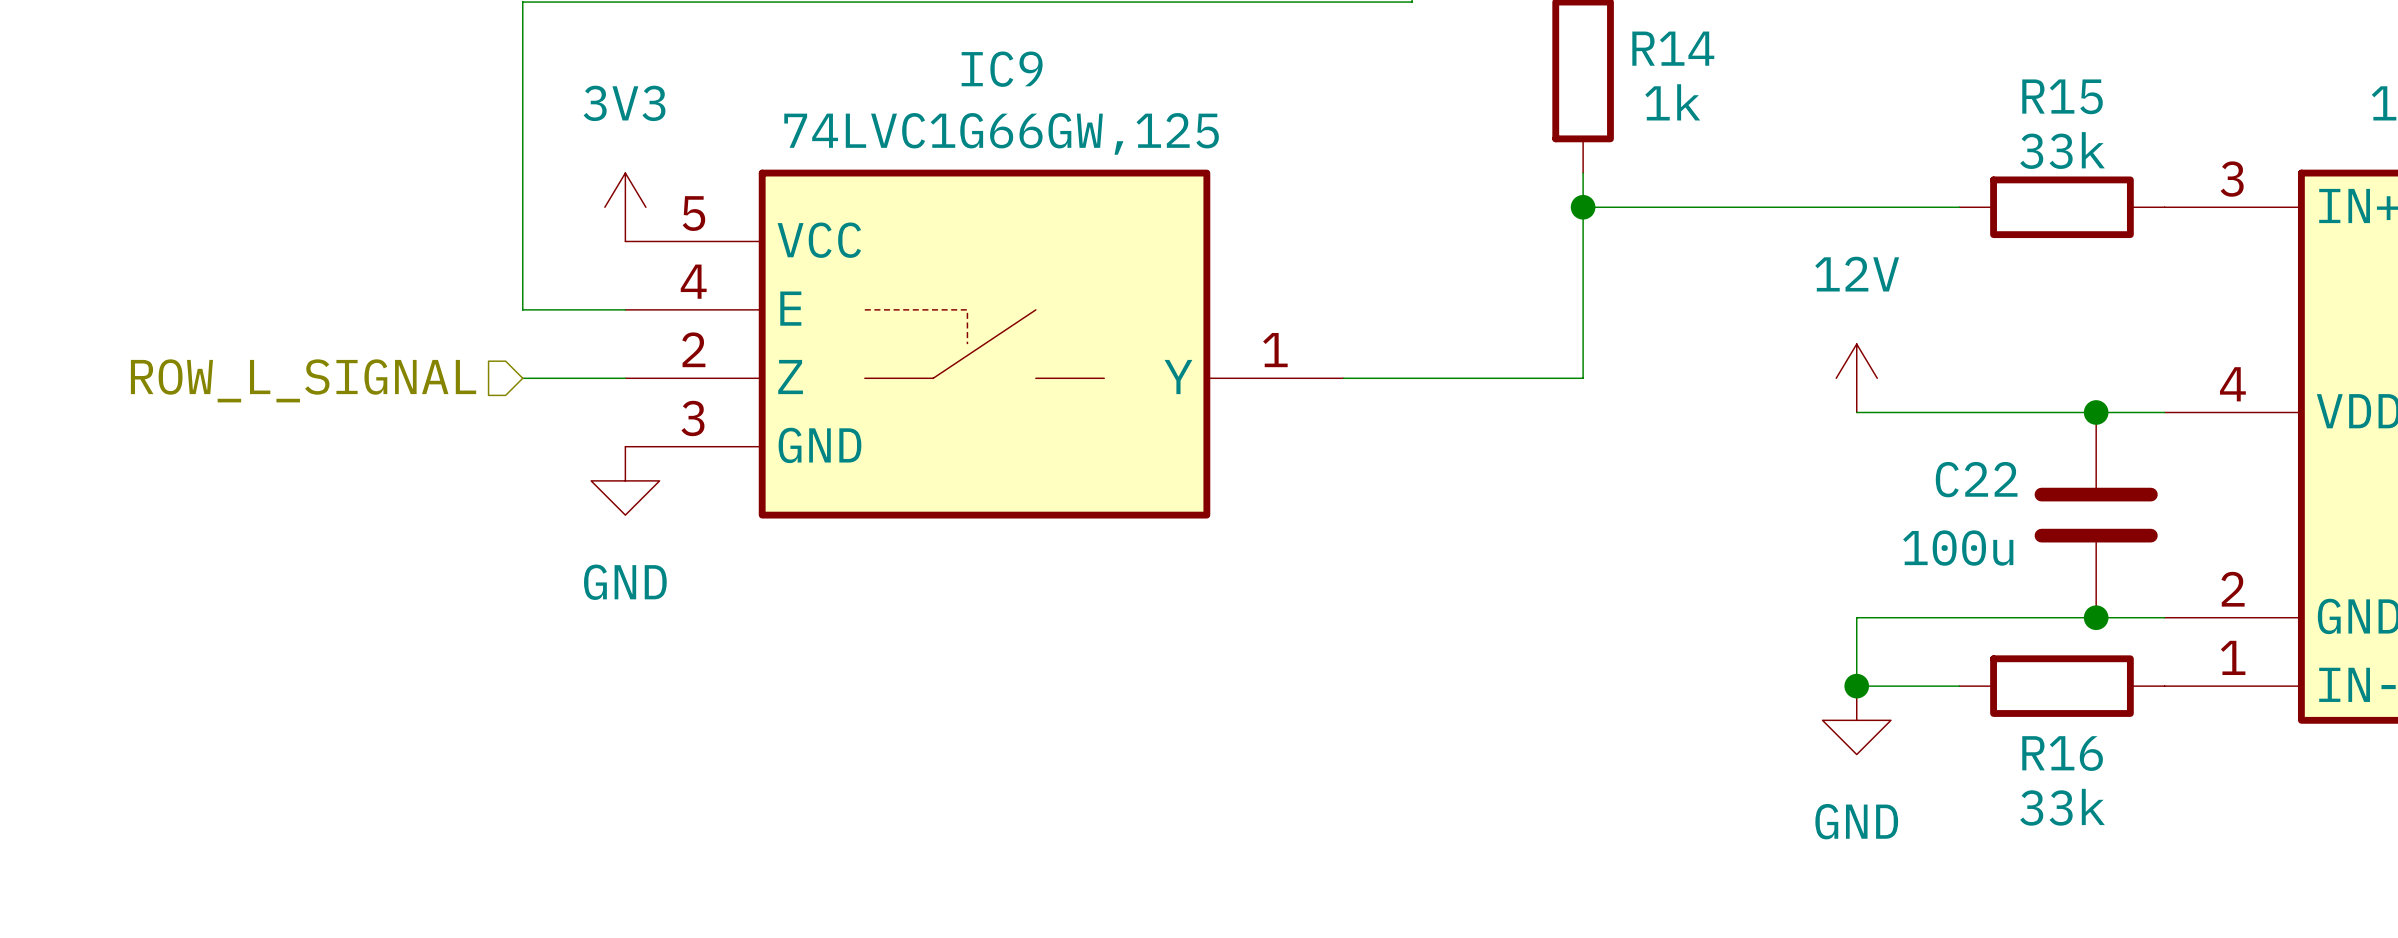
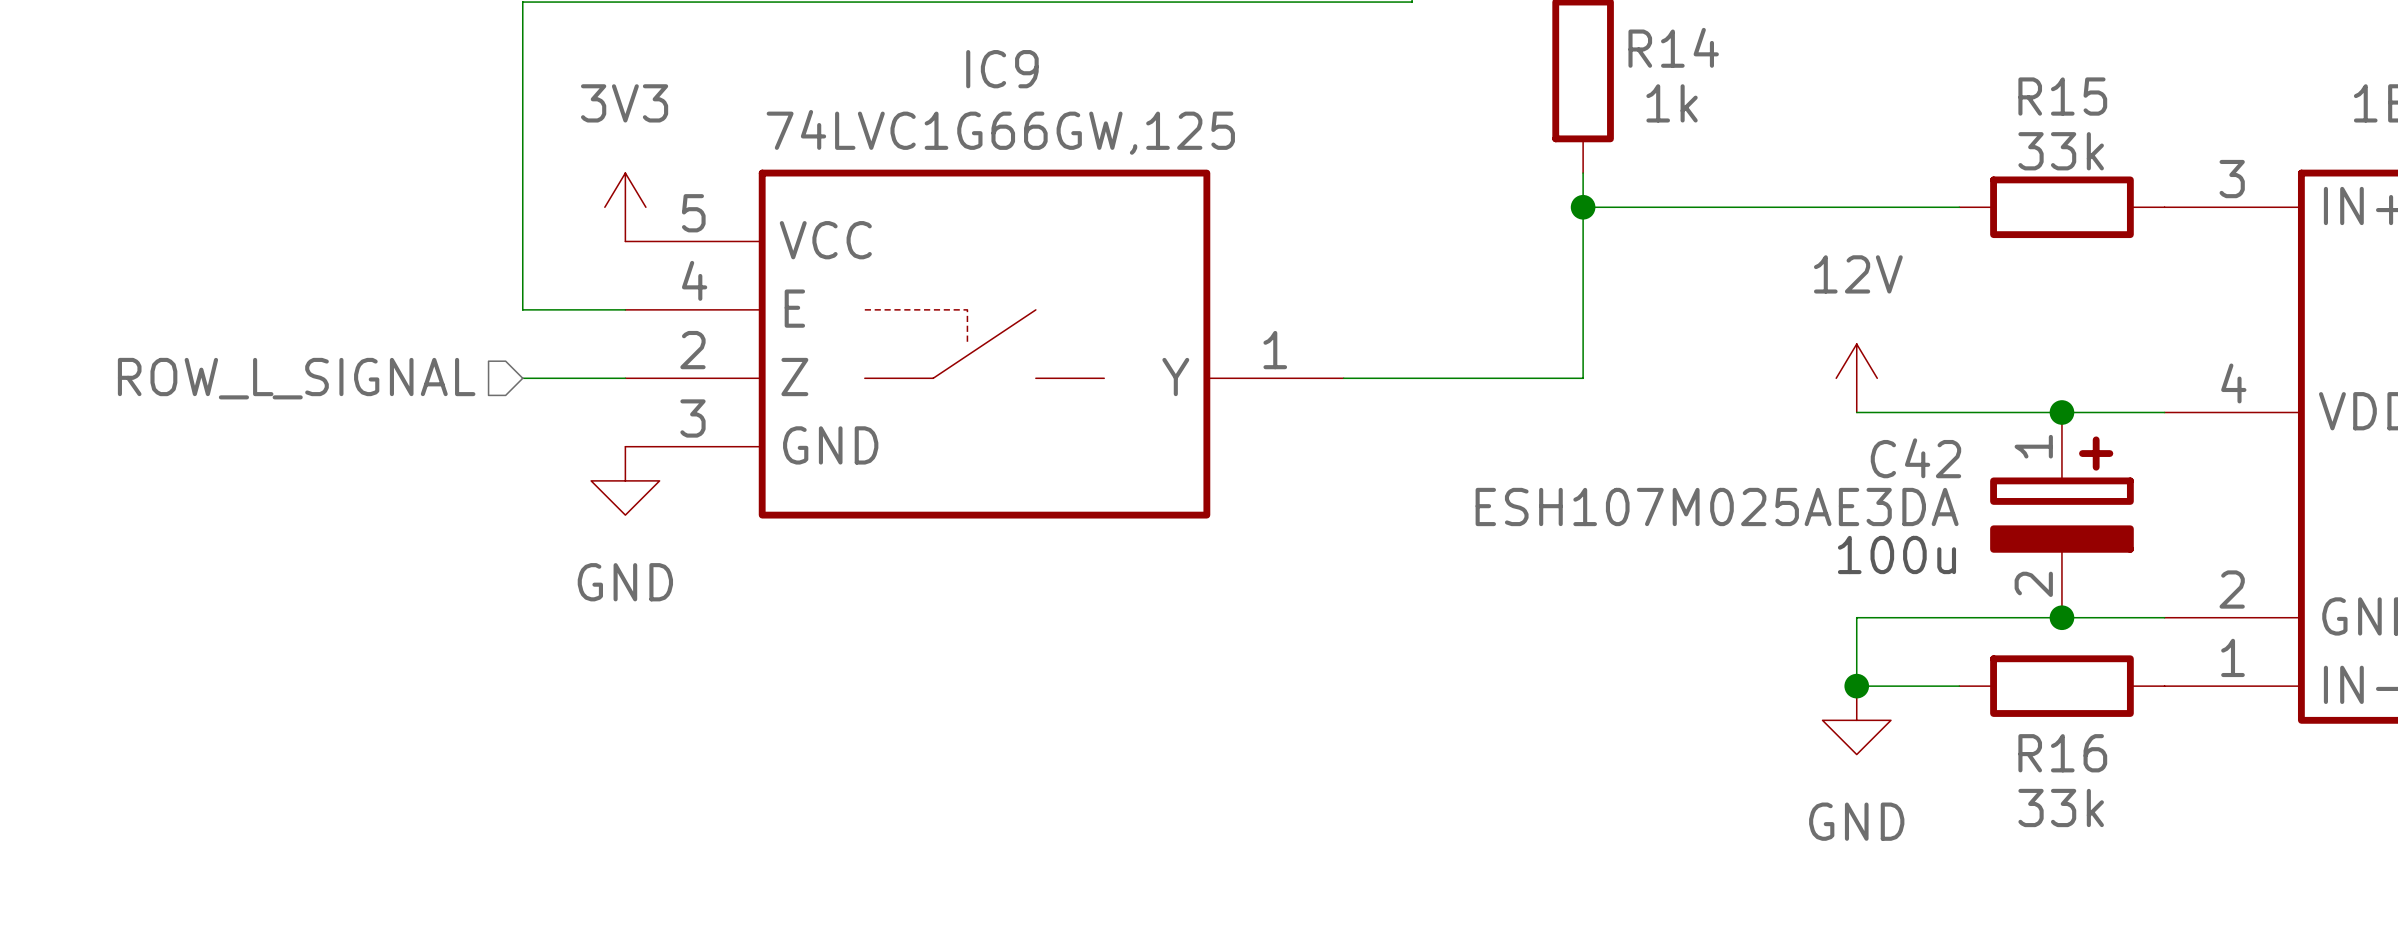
junction position: (2096, 412) -> (2061, 412)
C42: none -> ESH107M025AE3DA (2061, 515)
C22: 100u (2096, 515) -> none
text: none -> 100u (1896, 554)
junction position: (2096, 617) -> (2061, 617)

